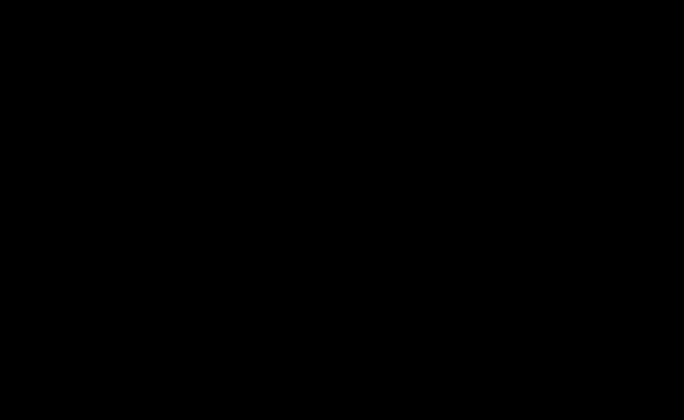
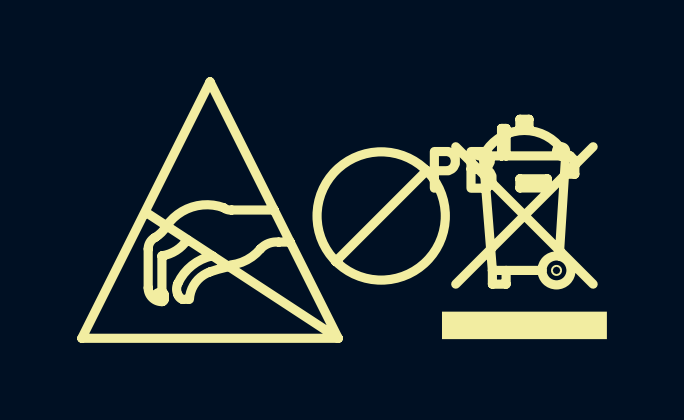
drawing: none -> [77, 77, 607, 343]

